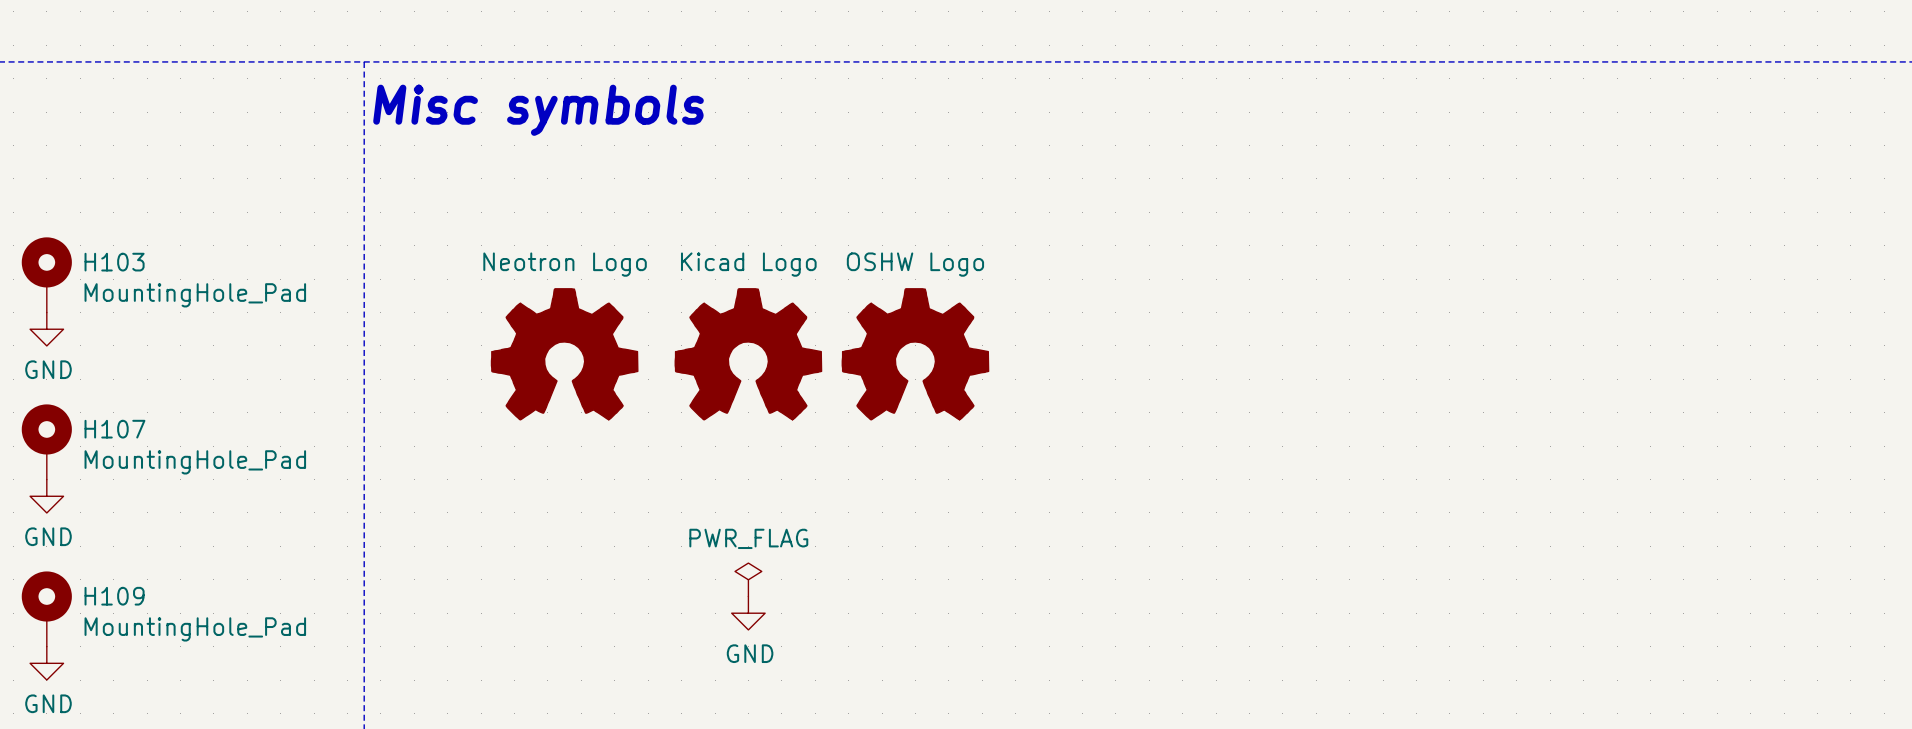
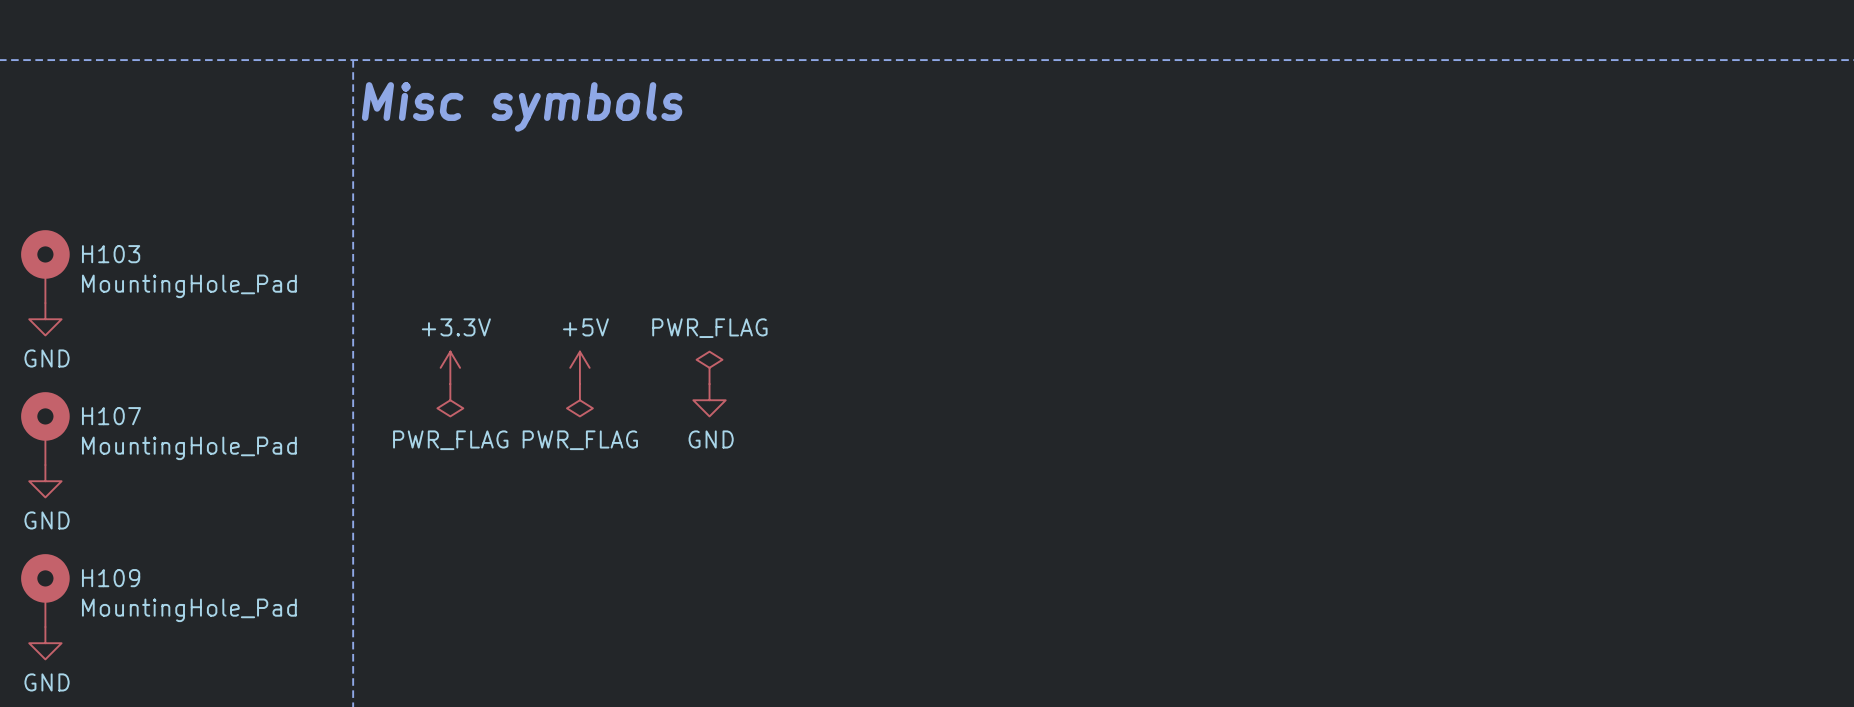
part: Neotron Logo (564, 354) -> none
part: Kicad Logo (748, 354) -> none
part: OSHW Logo (915, 354) -> none
power symbol: none -> +3.3V (450, 367)
power symbol: none -> +5V (579, 367)
power symbol: none -> PWR_FLAG (709, 367)
power symbol: none -> PWR_FLAG (450, 400)
power symbol: none -> PWR_FLAG (579, 400)
power symbol: PWR_FLAG (748, 579) -> none
power symbol position: GND (748, 613) -> GND (709, 400)

